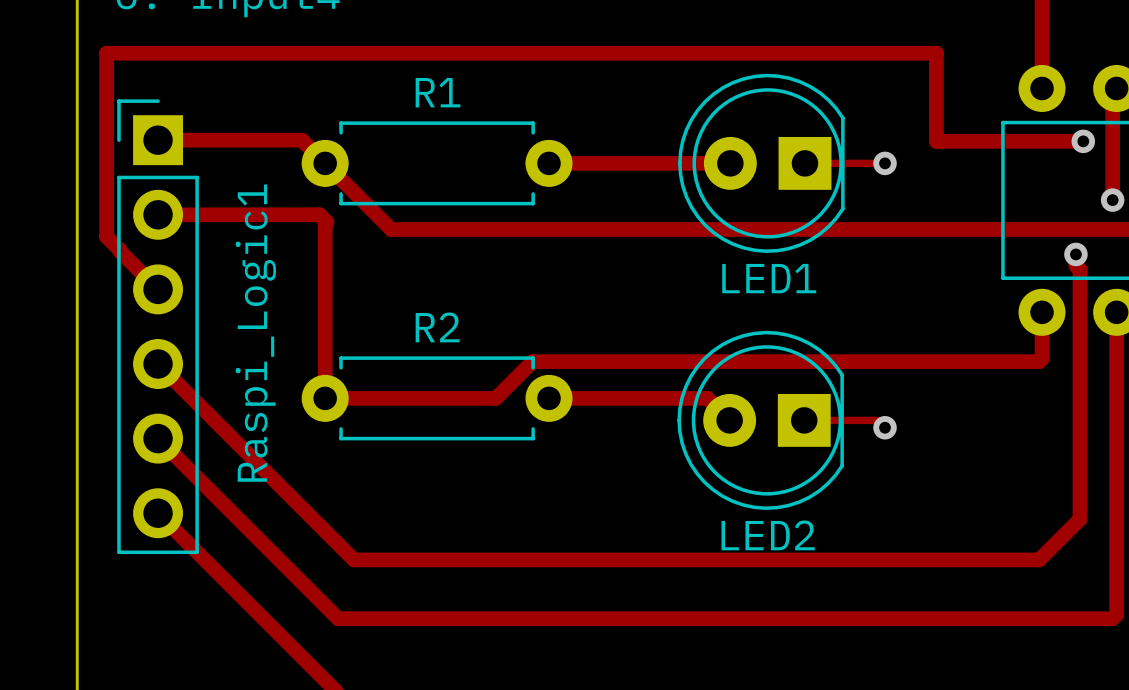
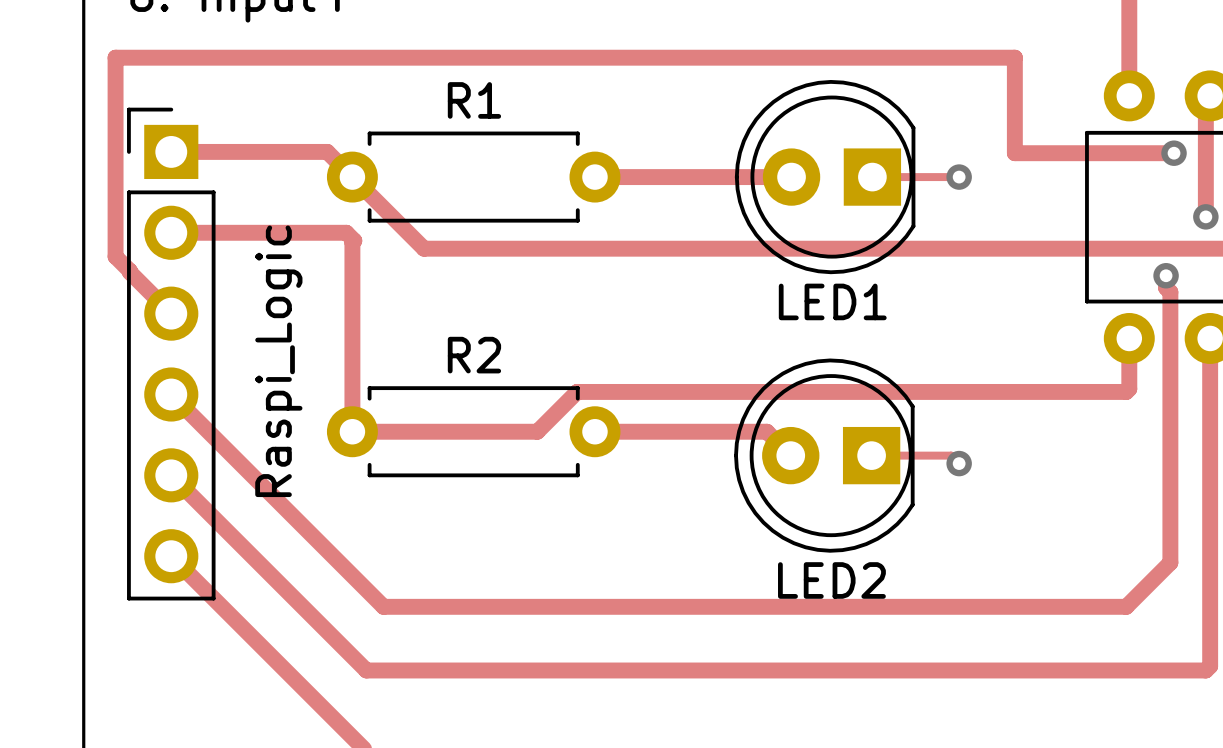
Raspi_Logic1 name: Raspi_Logic1 (255, 333) -> Raspi_Logic (278, 361)

